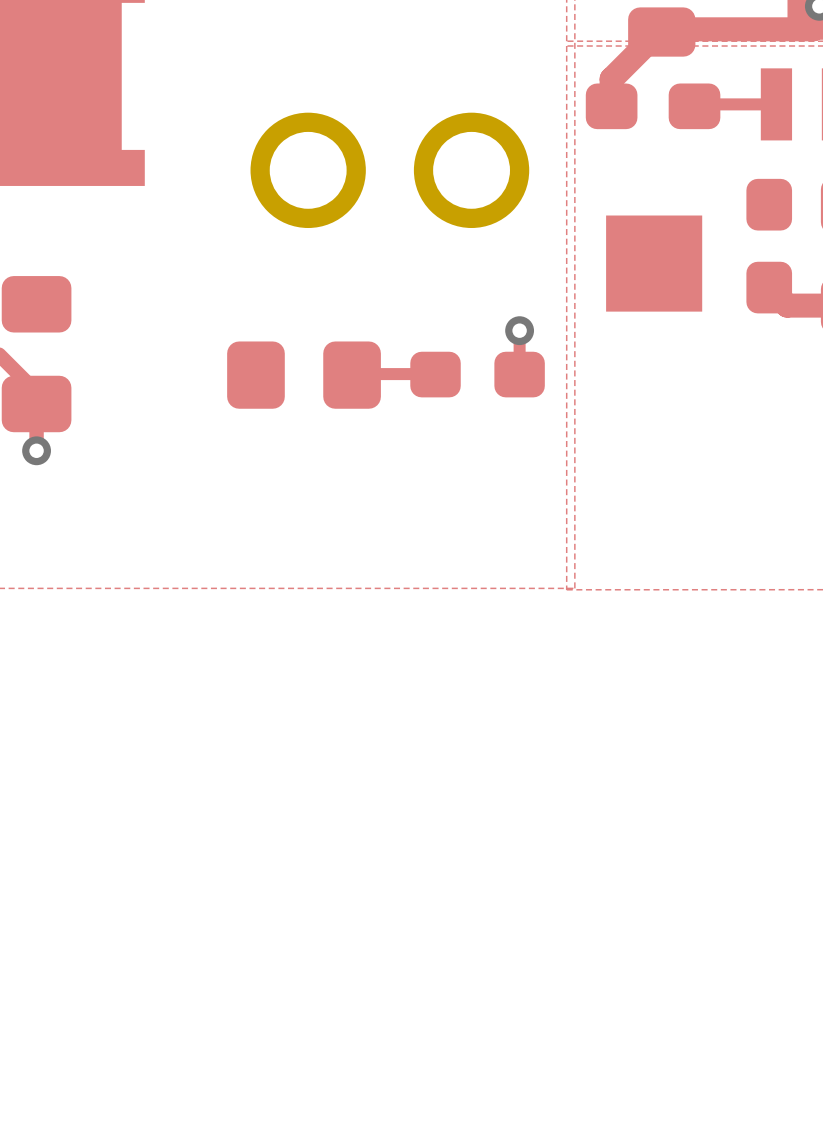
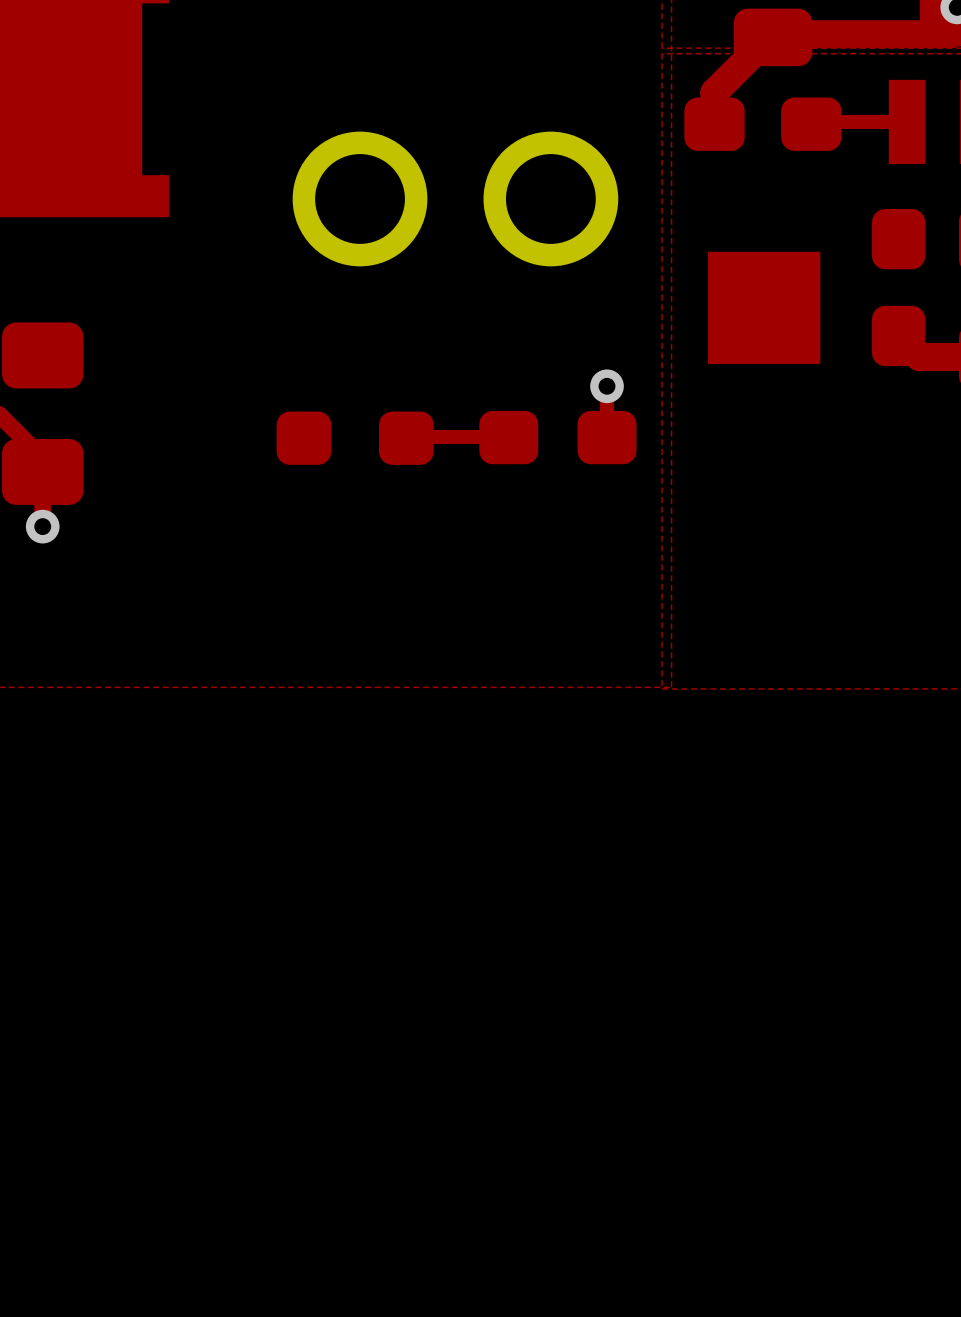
part footprint: [227, 341, 381, 409] -> [276, 411, 434, 465]

